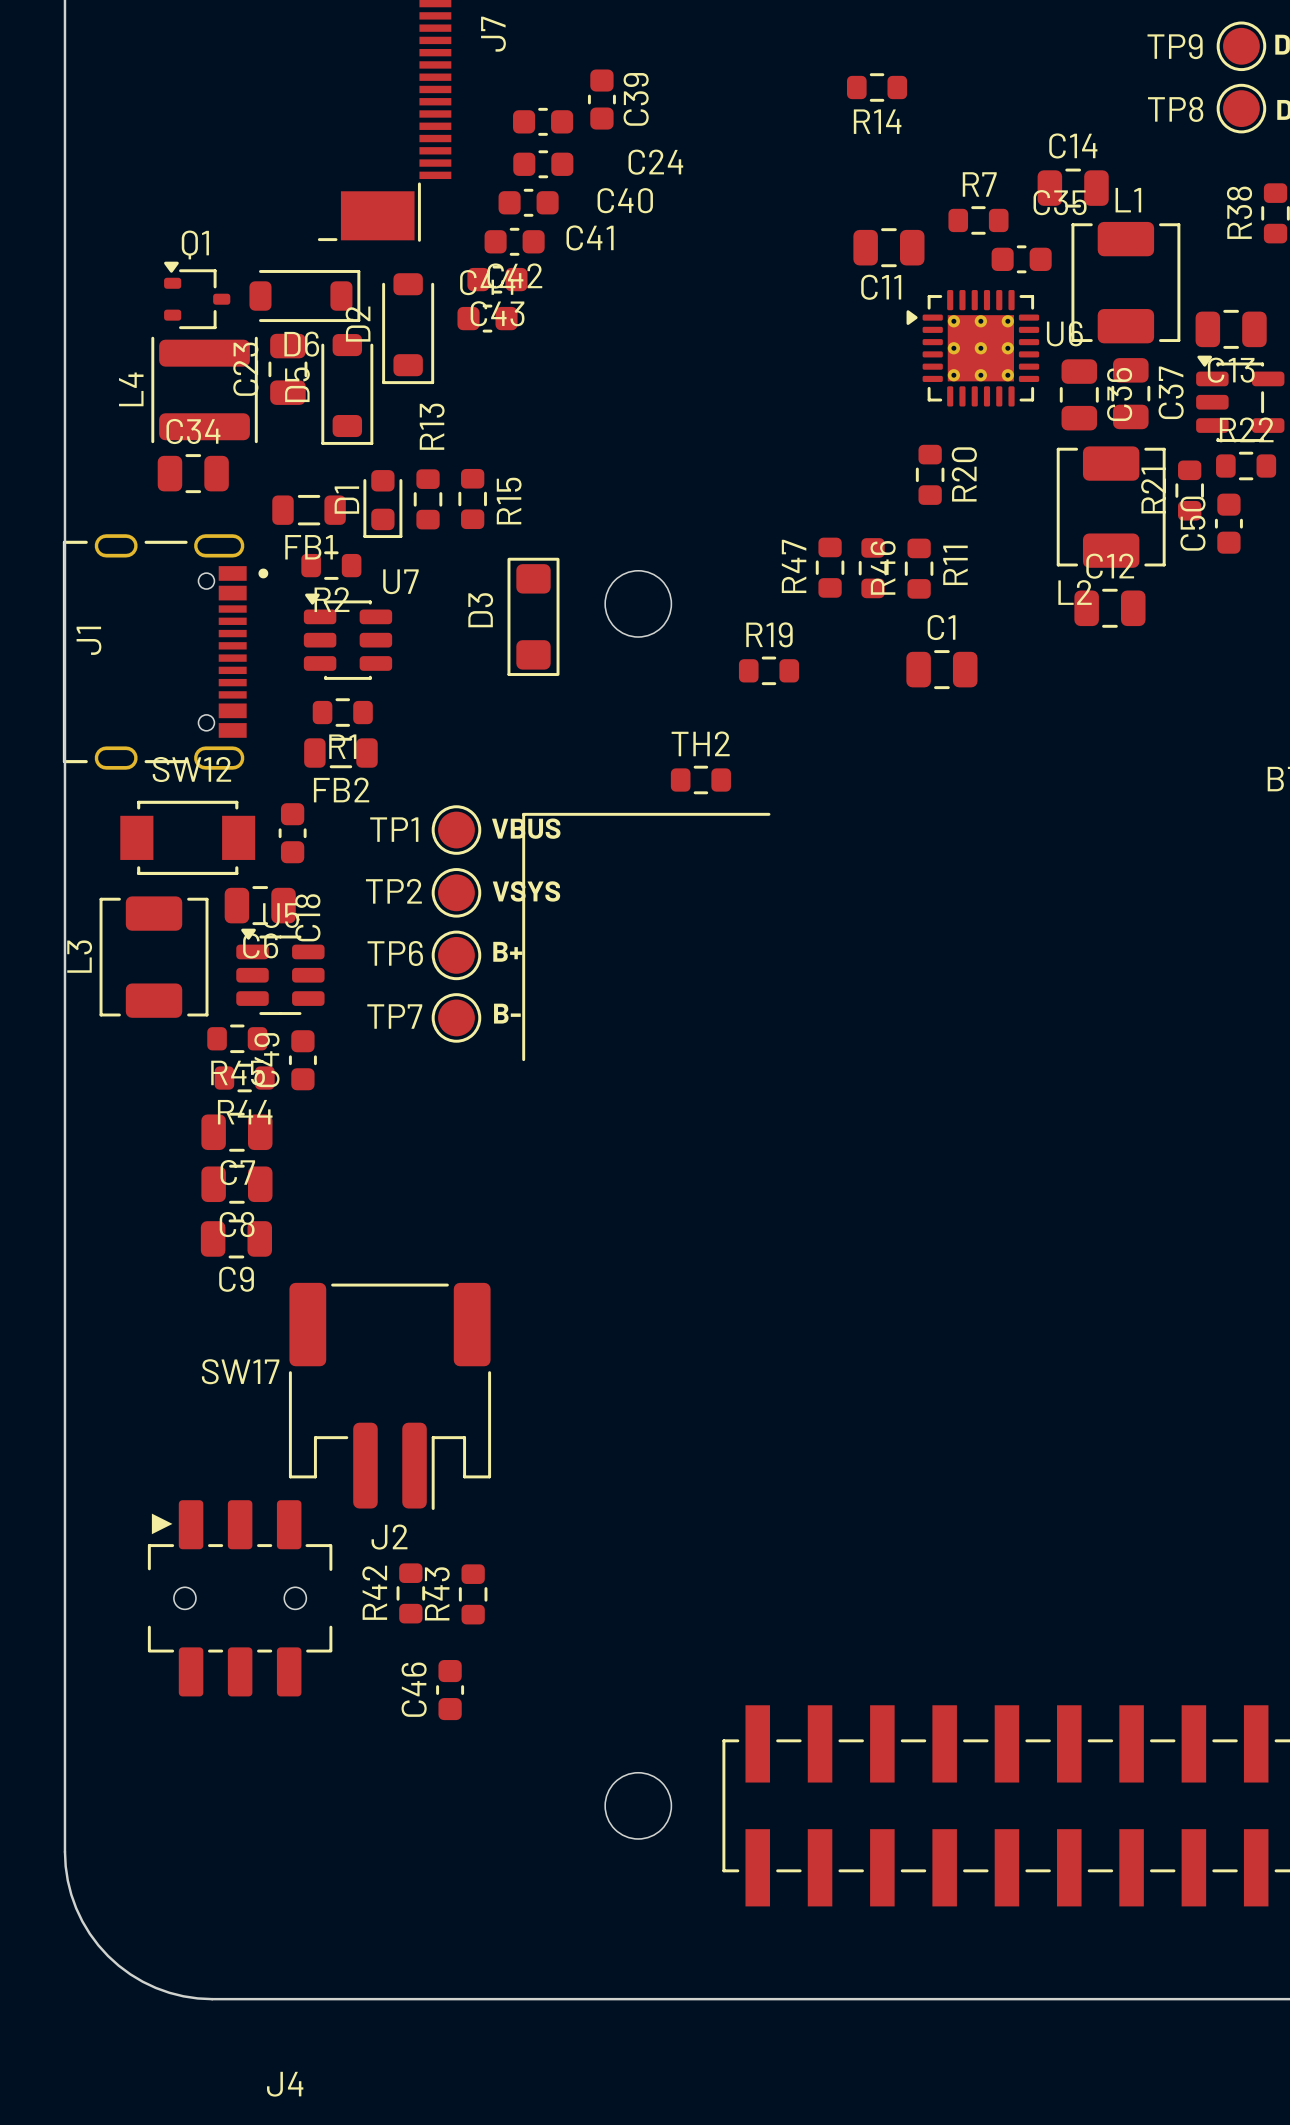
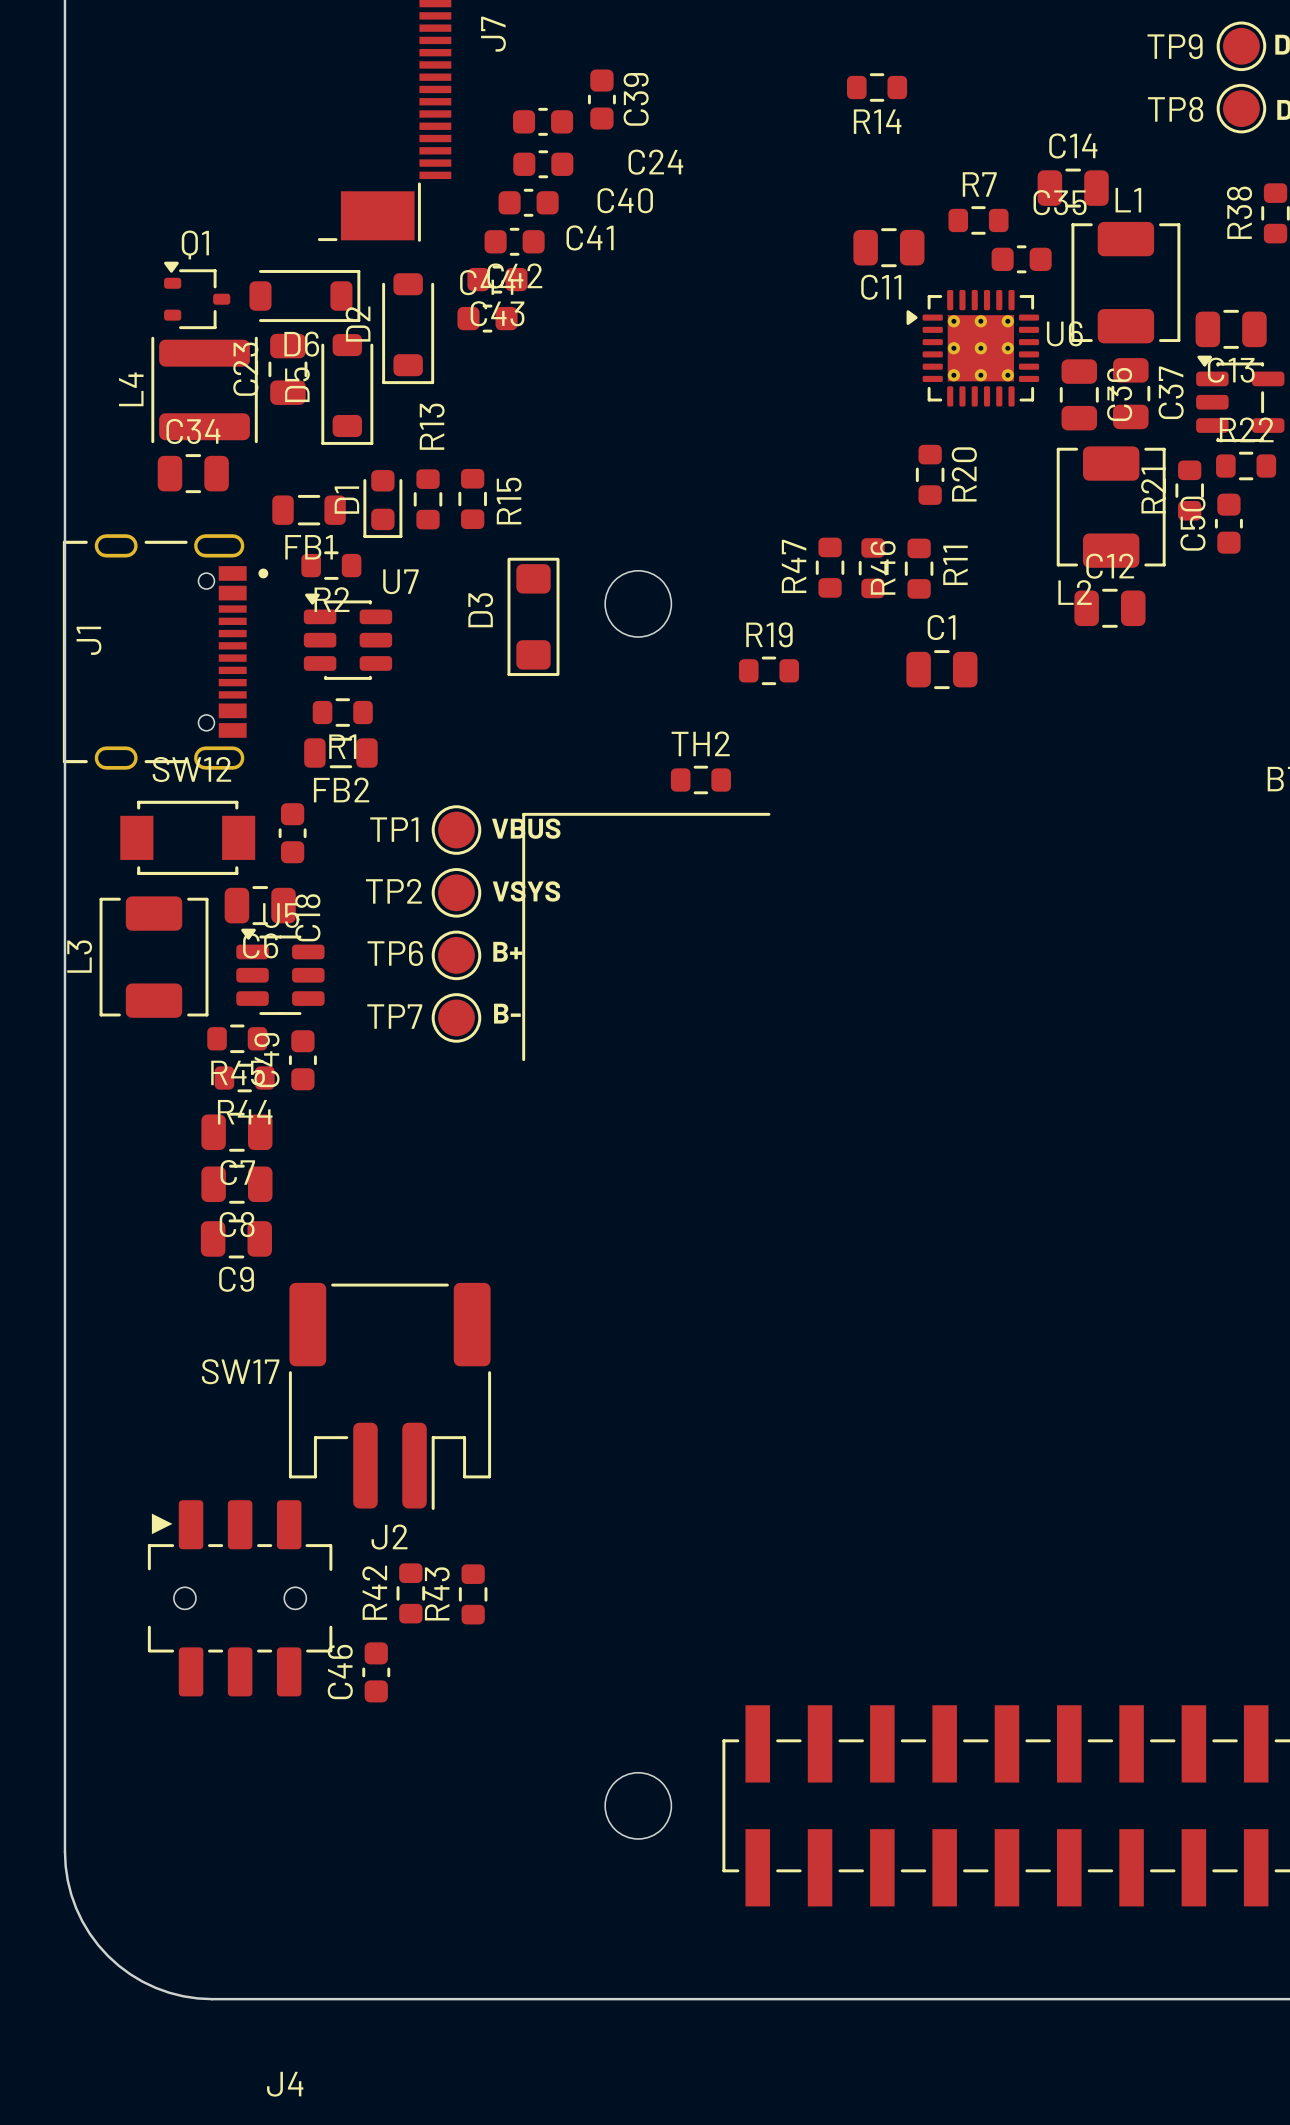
C46 position: (450, 1690) -> (376, 1672)

